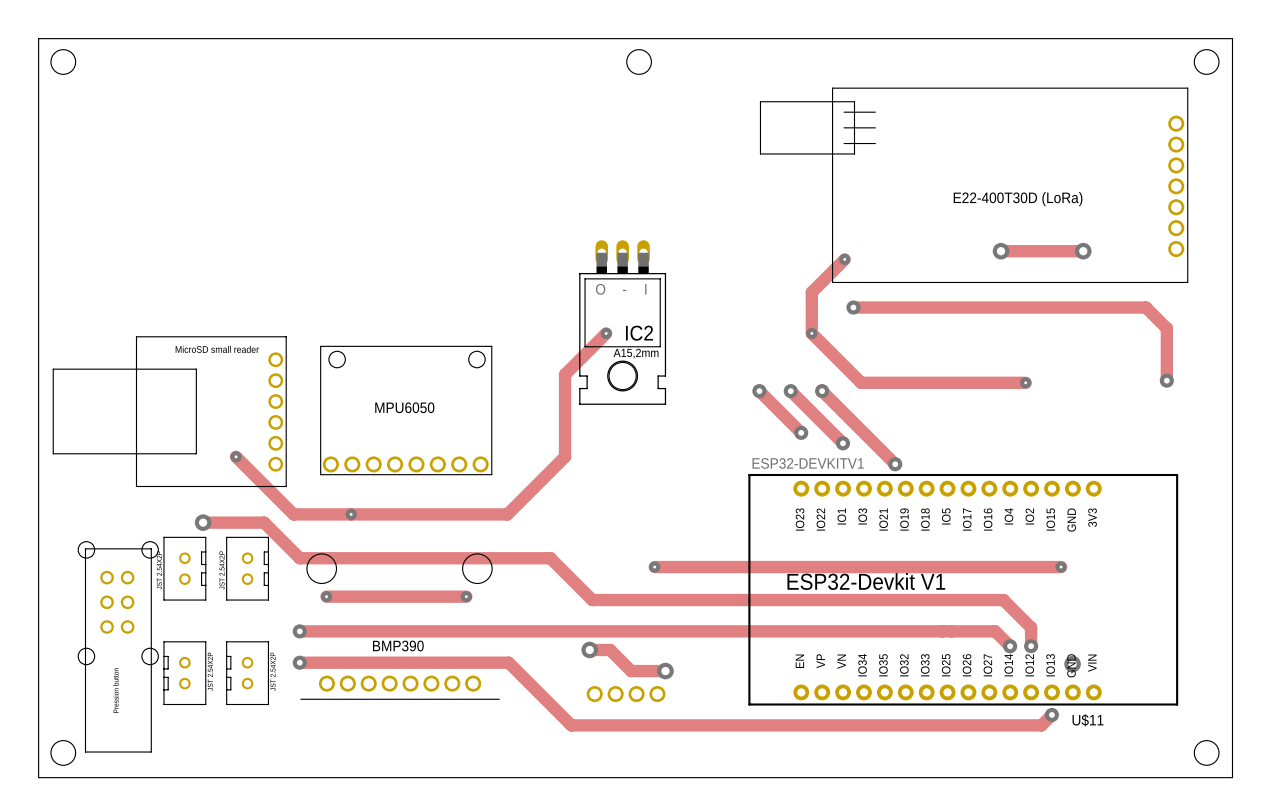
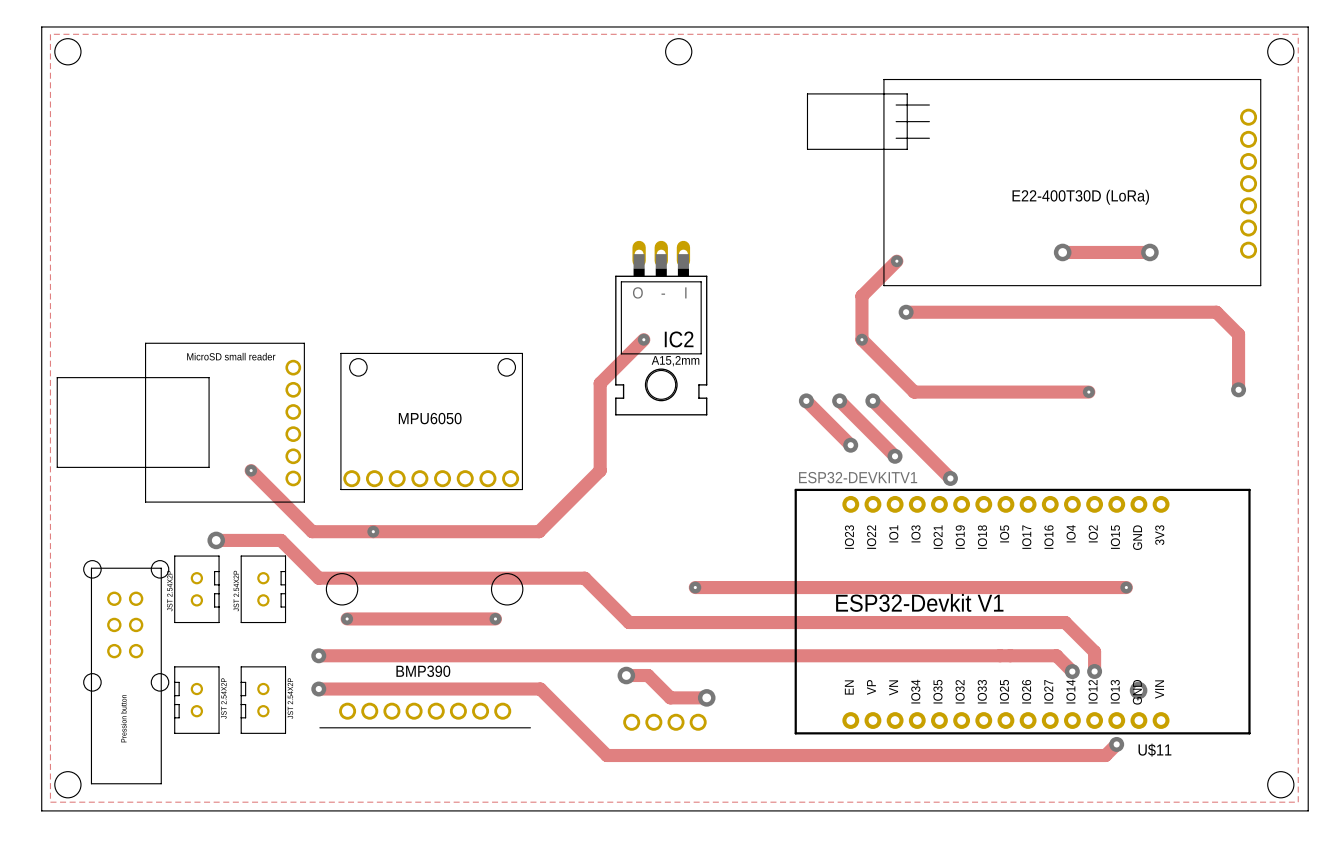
zone outline: none -> (50, 34) (50, 802) (1298, 802) (1298, 34) (50, 34)

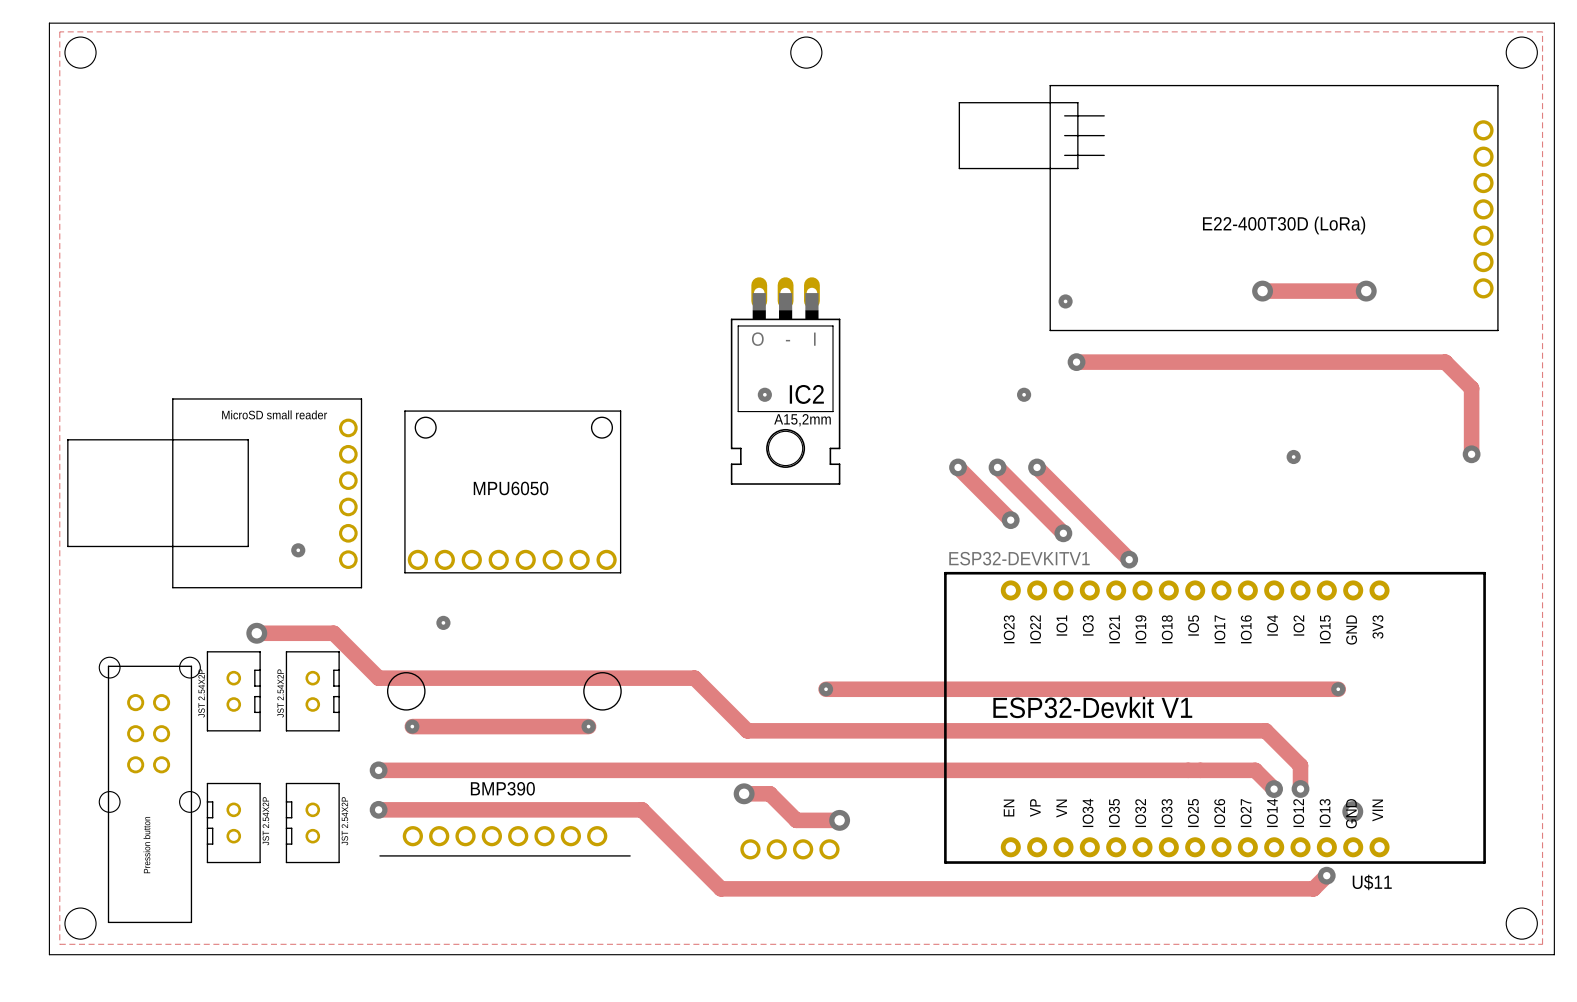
track: (896, 261) (861, 296) (861, 339) (914, 392) (1088, 392) -> none
track: (643, 339) (600, 383) (600, 470) (539, 531) (312, 531) (251, 470) -> none

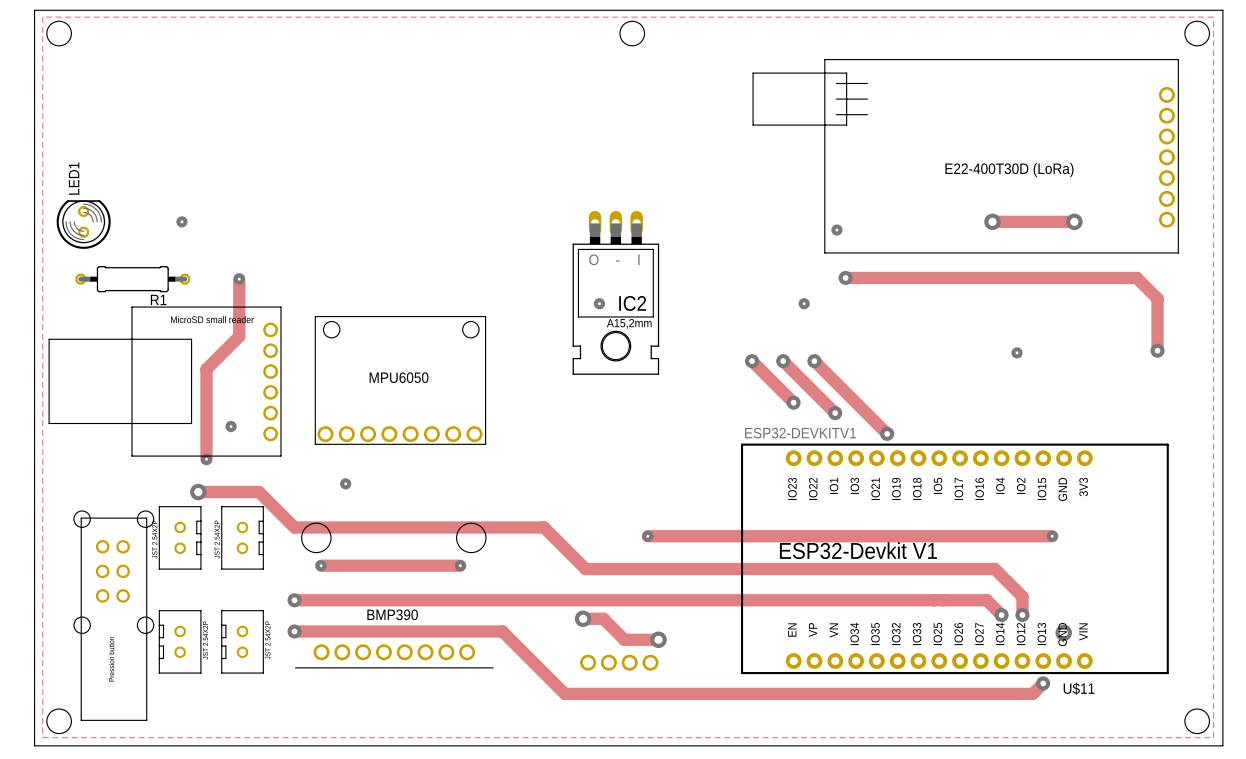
via: none -> (181, 221)
LED1: none -> (83, 224)
R1: none -> (132, 279)
track: none -> (239, 279) (239, 336) (206, 369) (206, 459)
via: none -> (239, 279)
via: none -> (206, 459)

